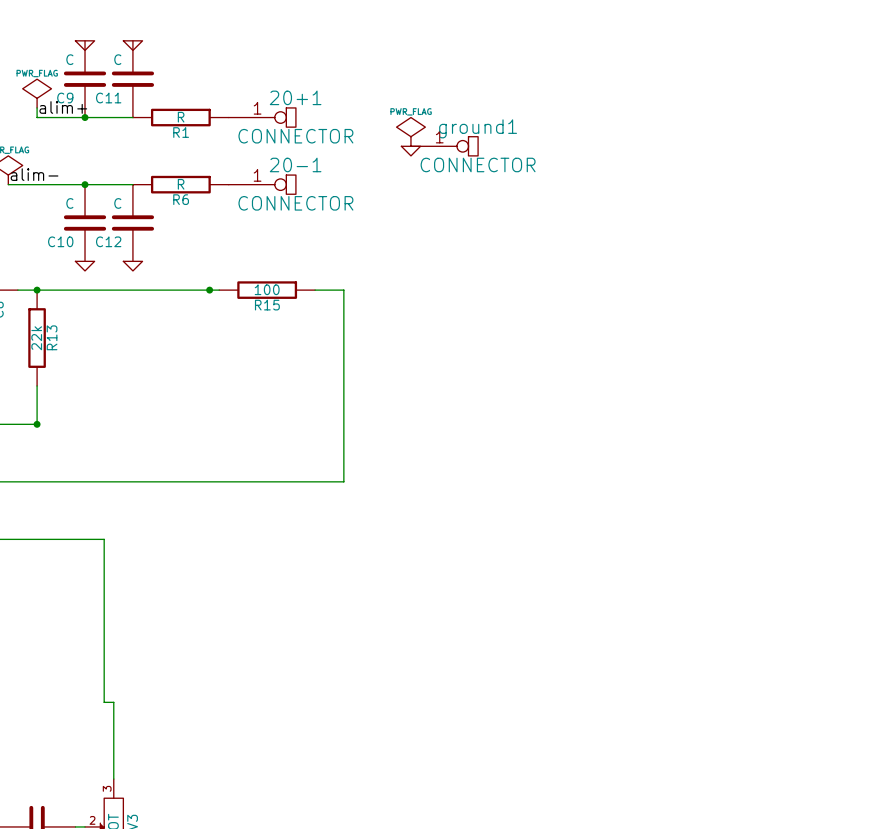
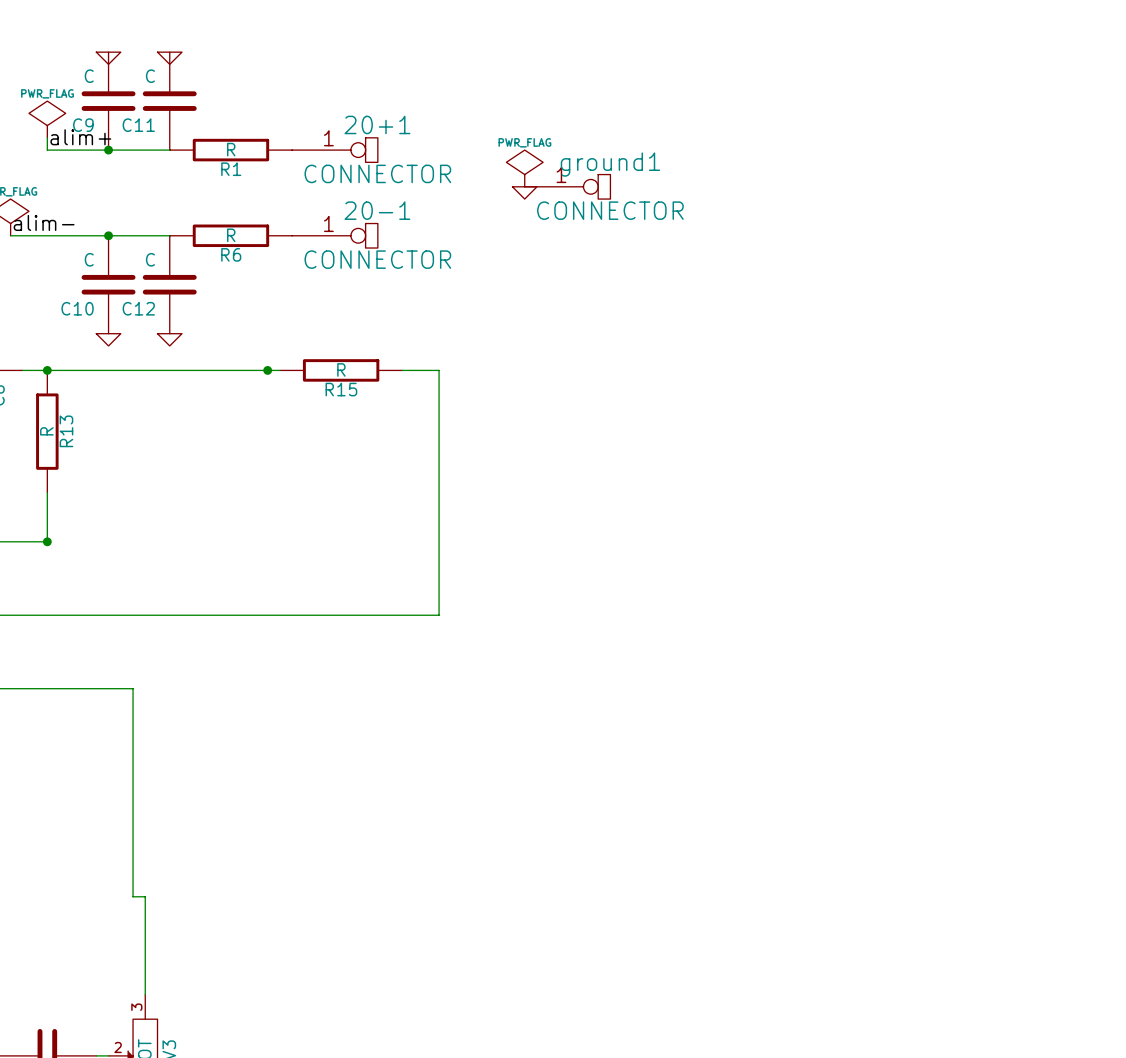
R15 value: 100 (267, 289) -> R (341, 369)
R13 value: 22k (36, 338) -> R (46, 431)

